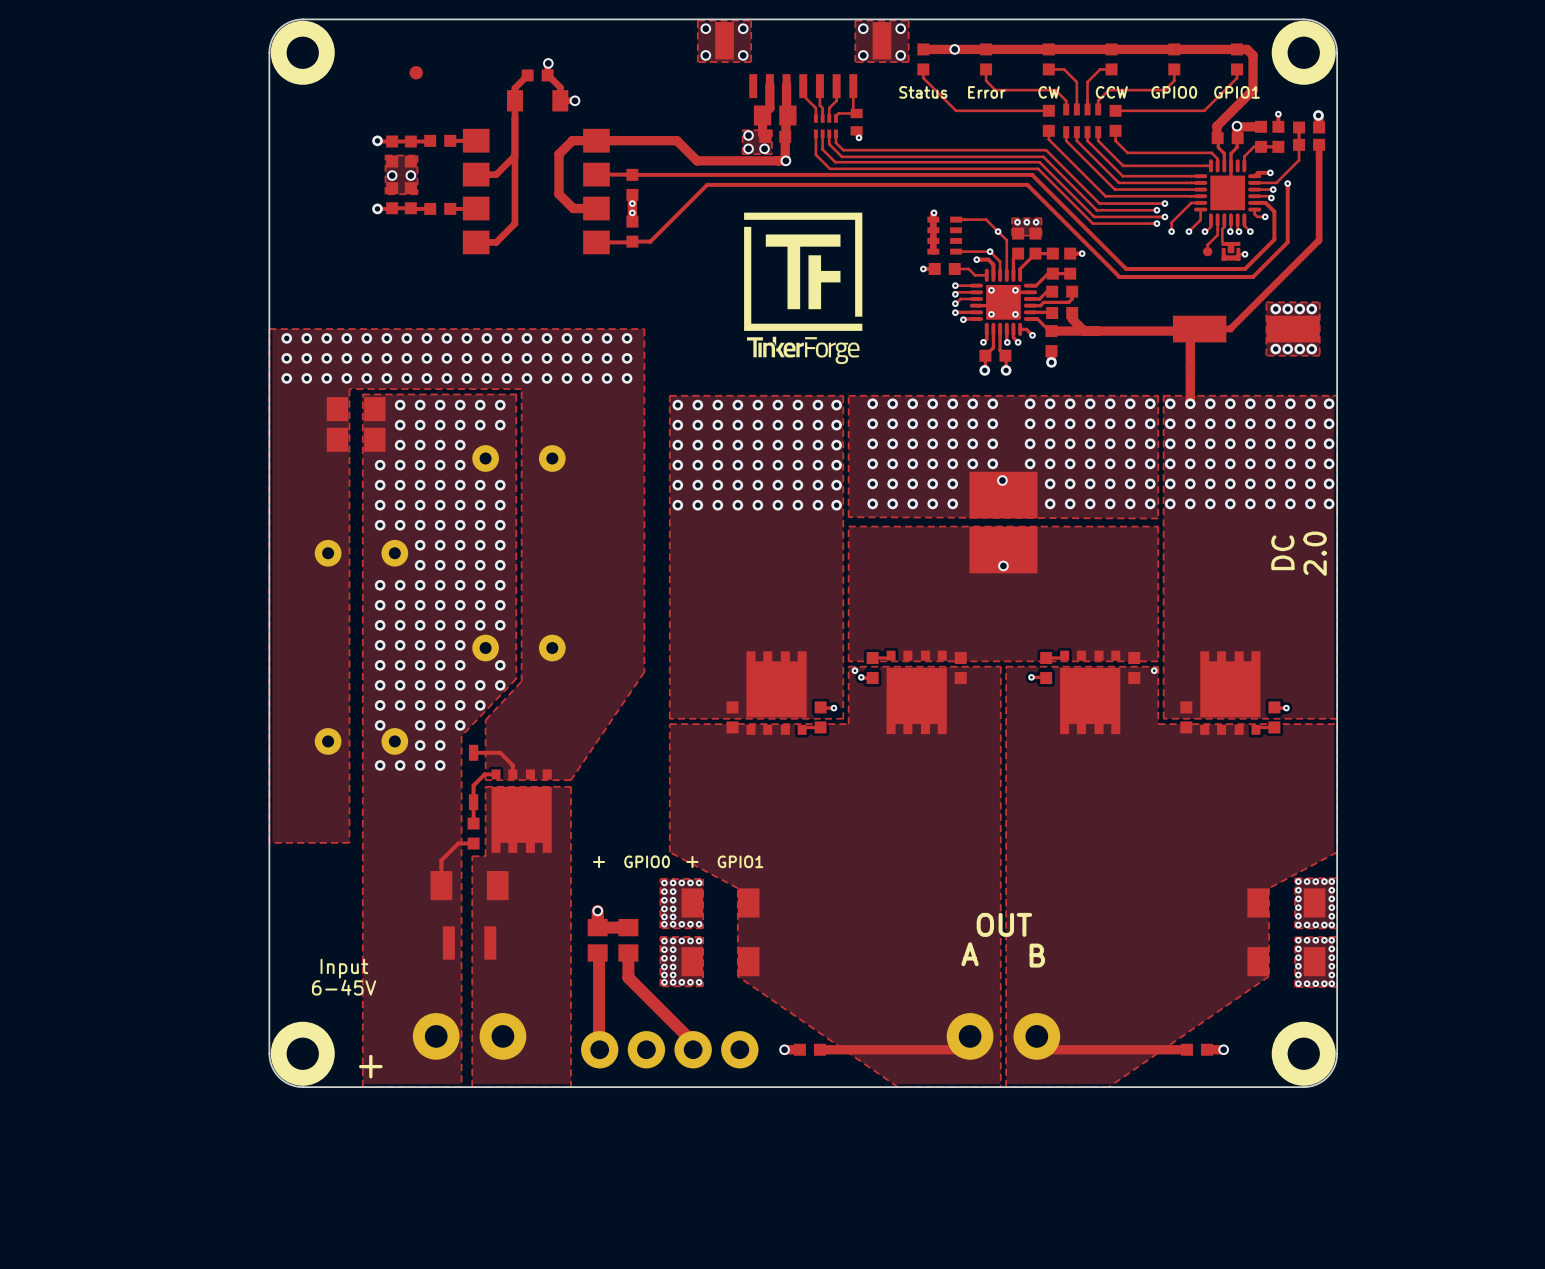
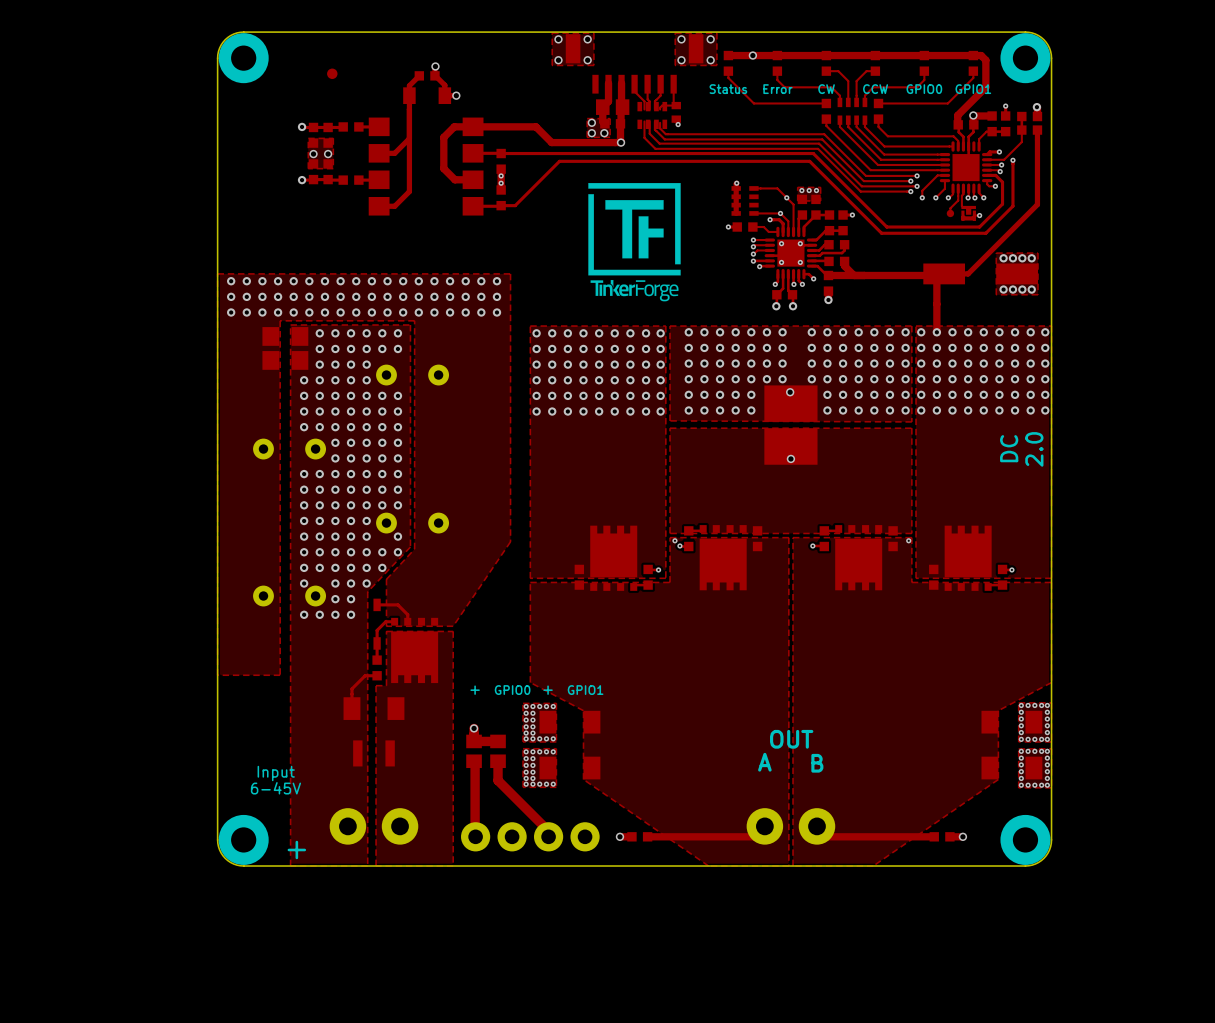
part footprint: [813, 114, 838, 139] -> [637, 101, 668, 130]

